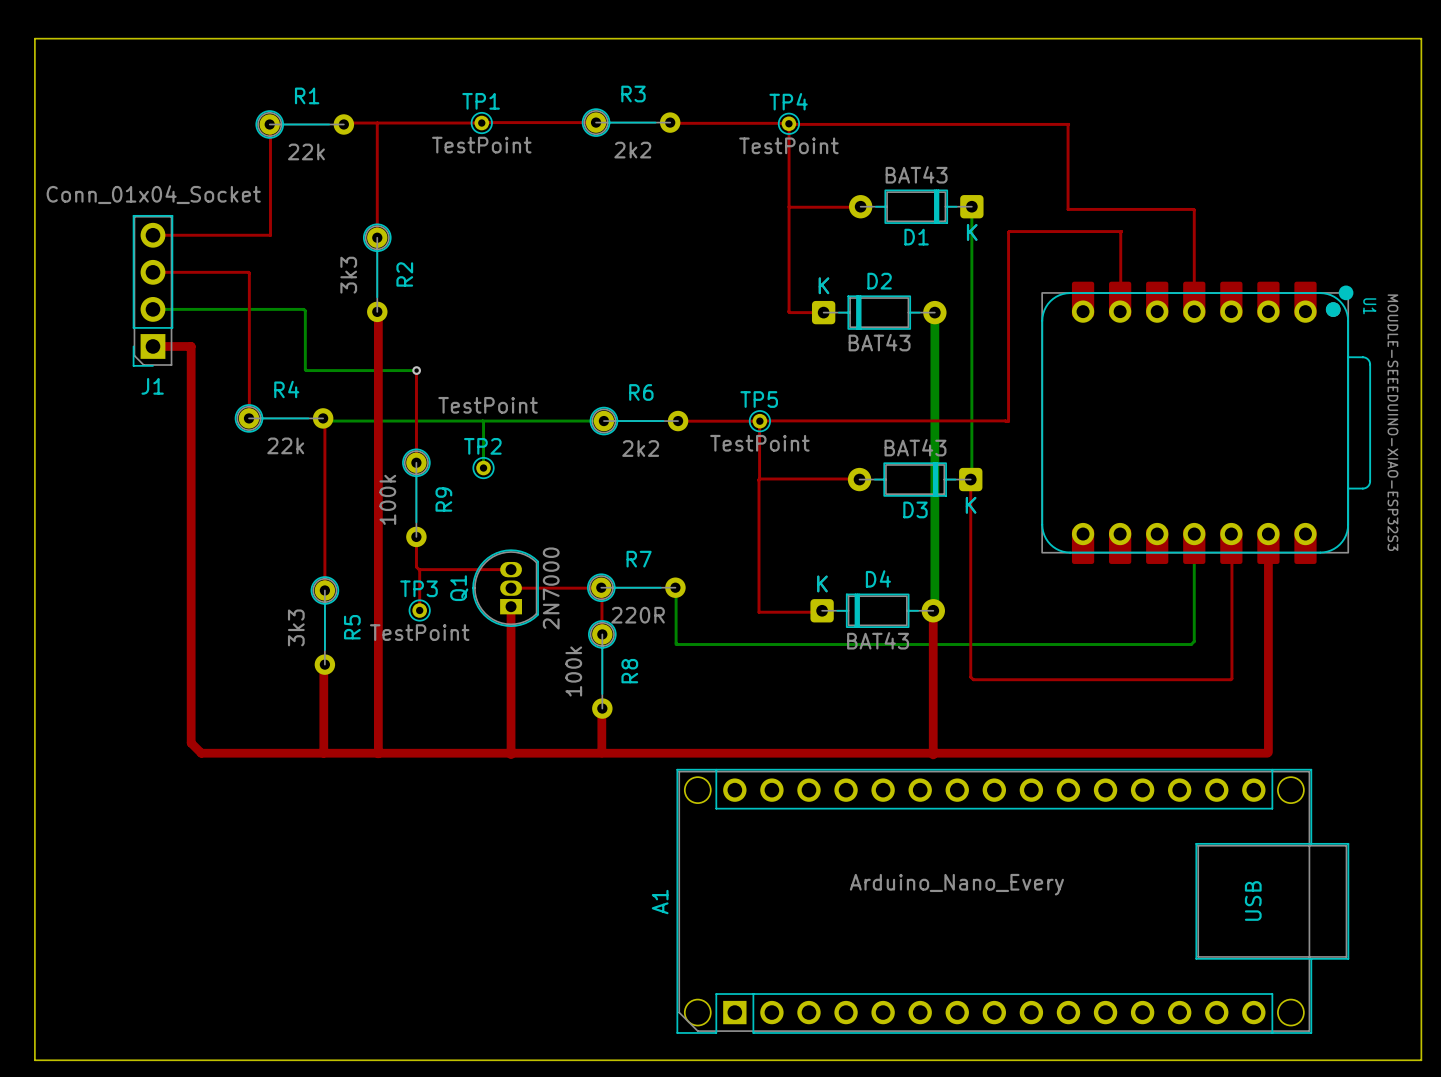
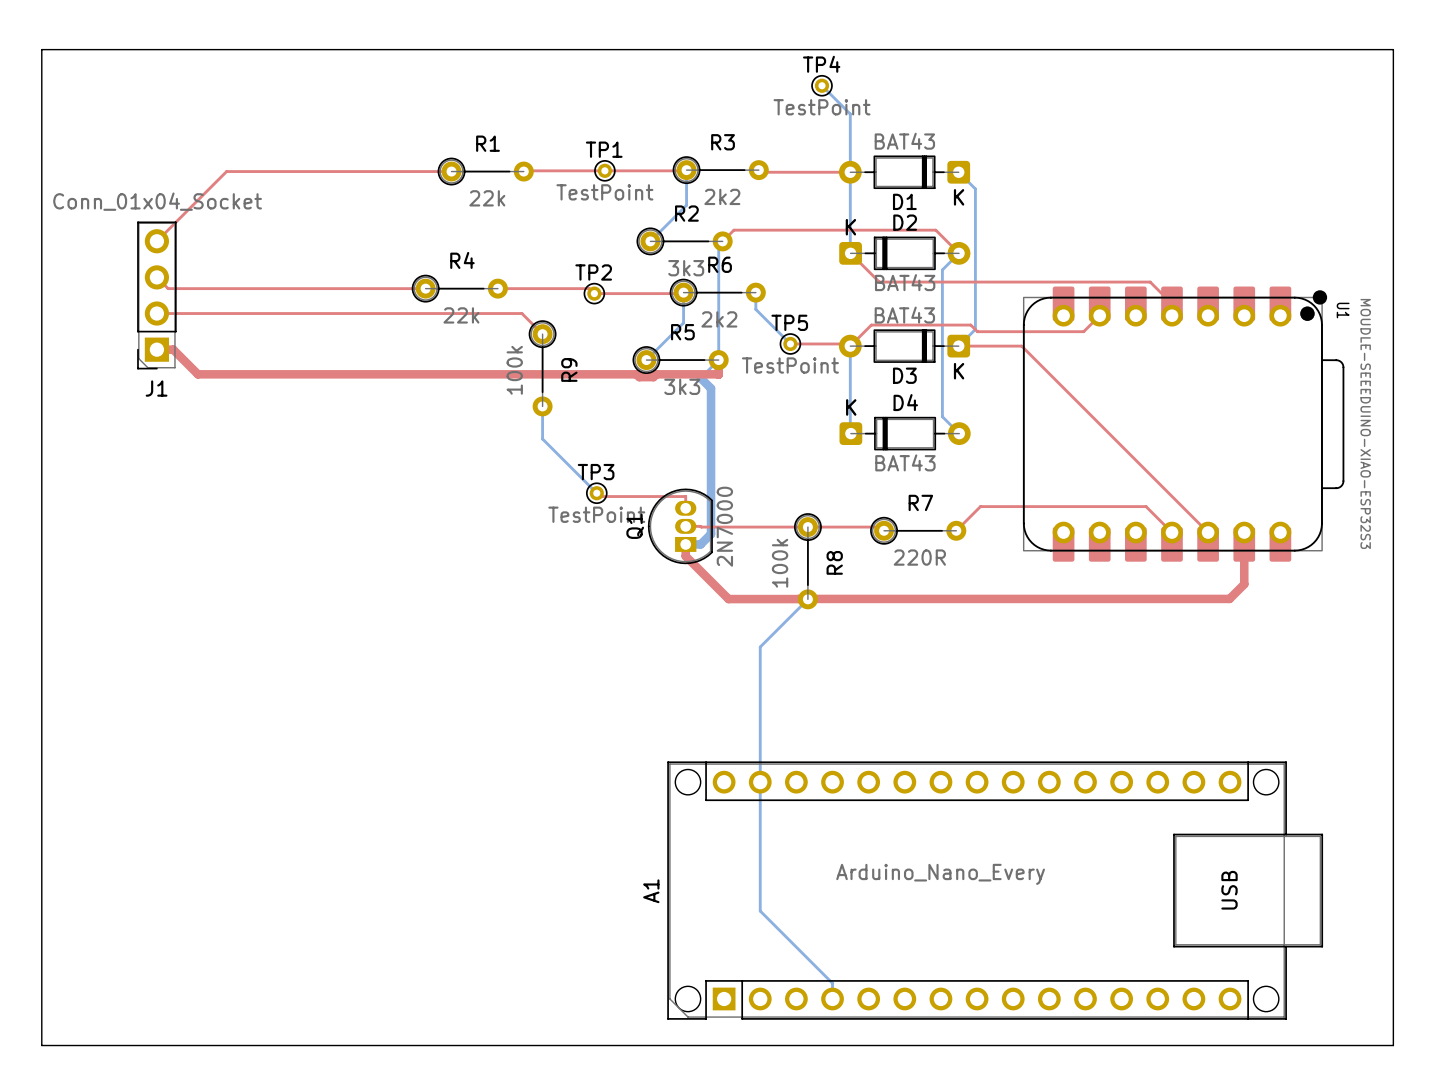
bottom track: none -> (822, 85) (850, 114) (850, 253)
top track: (596, 122) (343, 124) -> none
R3 position: (631, 122) -> (720, 170)
top track: (377, 123) (377, 237) -> none
TP1 position: (481, 123) -> (604, 170)
top track: (675, 123) (1068, 124) (1068, 209) (1194, 210) (1194, 299) -> (850, 253) (879, 282) (1150, 282) (1171, 303)
TP4 position: (788, 123) -> (822, 85)
top track: (789, 123) (788, 311) (823, 312) -> none
top track: (270, 124) (270, 235) (152, 235) -> (451, 171) (226, 171) (156, 241)
R1 position: (304, 124) -> (485, 171)
top track: none -> (686, 170) (523, 171)
bottom track: none -> (686, 170) (686, 205) (650, 241)
top track: none -> (758, 170) (760, 172) (850, 172)
bottom track: none -> (958, 172) (975, 188) (975, 329) (958, 346)
top track: (789, 206) (865, 207) -> none
D1 position: (916, 206) -> (904, 172)
bottom track: (971, 206) (970, 479) -> none
top track: none -> (722, 241) (733, 230) (935, 230) (959, 253)
bottom track: none -> (722, 241) (718, 245) (718, 360) (700, 378) (711, 388) (711, 534) (700, 544) (685, 544)
bottom track: none -> (959, 253) (942, 269) (942, 416) (959, 433)
top track: (152, 272) (249, 273) -> (156, 277) (168, 288) (425, 288)
R2 rotation: 0° (377, 272) -> 90° counterclockwise (684, 241)
R2 position: (377, 272) -> (684, 241)
top track: (249, 273) (249, 419) -> none
top track: none -> (497, 288) (589, 288) (594, 293) (683, 292)
bottom track: none -> (683, 292) (683, 322) (646, 360)
bottom track: none -> (755, 292) (755, 309) (790, 343)
top track: (1120, 297) (1121, 231) (1009, 231) (1008, 421) (761, 420) -> none
top track: none -> (1099, 303) (1099, 315) (1083, 331) (977, 331) (970, 325) (871, 325) (850, 346) (848, 343) (790, 343)
top track: none -> (156, 313) (521, 313) (542, 334)
bottom track: (152, 309) (303, 309) (306, 370) (416, 370) -> none
top track: (378, 310) (377, 754) -> none
D2 position: (879, 312) -> (904, 253)
bottom track: (934, 312) (934, 609) (933, 610) -> none
bottom track: none -> (850, 346) (850, 433)
top track: none -> (958, 346) (1021, 346) (1208, 532) (1208, 544)
top track: (169, 346) (191, 346) (191, 743) (201, 753) (1267, 753) -> (173, 349) (197, 374) (636, 374) (639, 377) (653, 377) (656, 374) (718, 374) (718, 360)
top track: (416, 370) (416, 459) -> none
via: (416, 370) -> none
bottom track: none -> (542, 406) (542, 439) (596, 493)
TP2 value: TestPoint (488, 405) -> none
R4 position: (284, 418) -> (459, 288)
top track: (323, 418) (324, 420) (324, 590) -> none
bottom track: (324, 421) (603, 421) -> none
bottom track: (482, 421) (483, 468) -> none
R6 position: (638, 421) -> (717, 292)
top track: (678, 421) (759, 421) (759, 478) -> none
TP5 position: (759, 421) -> (790, 343)
TP2 position: (483, 468) -> (594, 293)
top track: (759, 478) (758, 612) (822, 612) -> none
top track: (759, 478) (865, 478) -> none
D3 position: (915, 479) -> (904, 346)
top track: (970, 479) (970, 677) (973, 679) (1230, 679) (1231, 533) -> none
top track: none -> (596, 493) (600, 496) (685, 496) (685, 508)
R9 position: (416, 497) -> (542, 368)
top track: none -> (685, 526) (880, 527) (884, 530)
top track: none -> (956, 530) (980, 506) (1146, 506) (1171, 532) (1171, 544)
top track: (416, 533) (416, 567) (419, 570) (419, 610) -> none
bottom track: (1194, 534) (1194, 641) (1191, 644) (676, 644) -> none
top track: none -> (685, 544) (685, 556) (728, 599) (807, 599)
top track: (419, 569) (511, 569) -> none
bottom track: (676, 586) (677, 644) -> none
R7 position: (636, 587) -> (918, 530)
top track: (1268, 587) (1268, 752) -> (1244, 584) (1229, 598) (798, 598)
Q1 position: (505, 588) -> (680, 526)
top track: (511, 588) (601, 586) (601, 632) -> none
bottom track: none -> (807, 599) (760, 647) (760, 911) (832, 983) (832, 998)
top track: (511, 606) (510, 754) -> none
TP3 position: (419, 610) -> (596, 493)
D4 position: (877, 610) -> (905, 433)
top track: (933, 612) (933, 754) -> none
R5 rotation: 0° (324, 625) -> 90° counterclockwise (680, 360)
R5 position: (324, 625) -> (680, 360)
top track: (323, 663) (323, 753) (321, 755) -> none
R8 position: (602, 669) -> (807, 561)
top track: (601, 707) (601, 752) -> none

